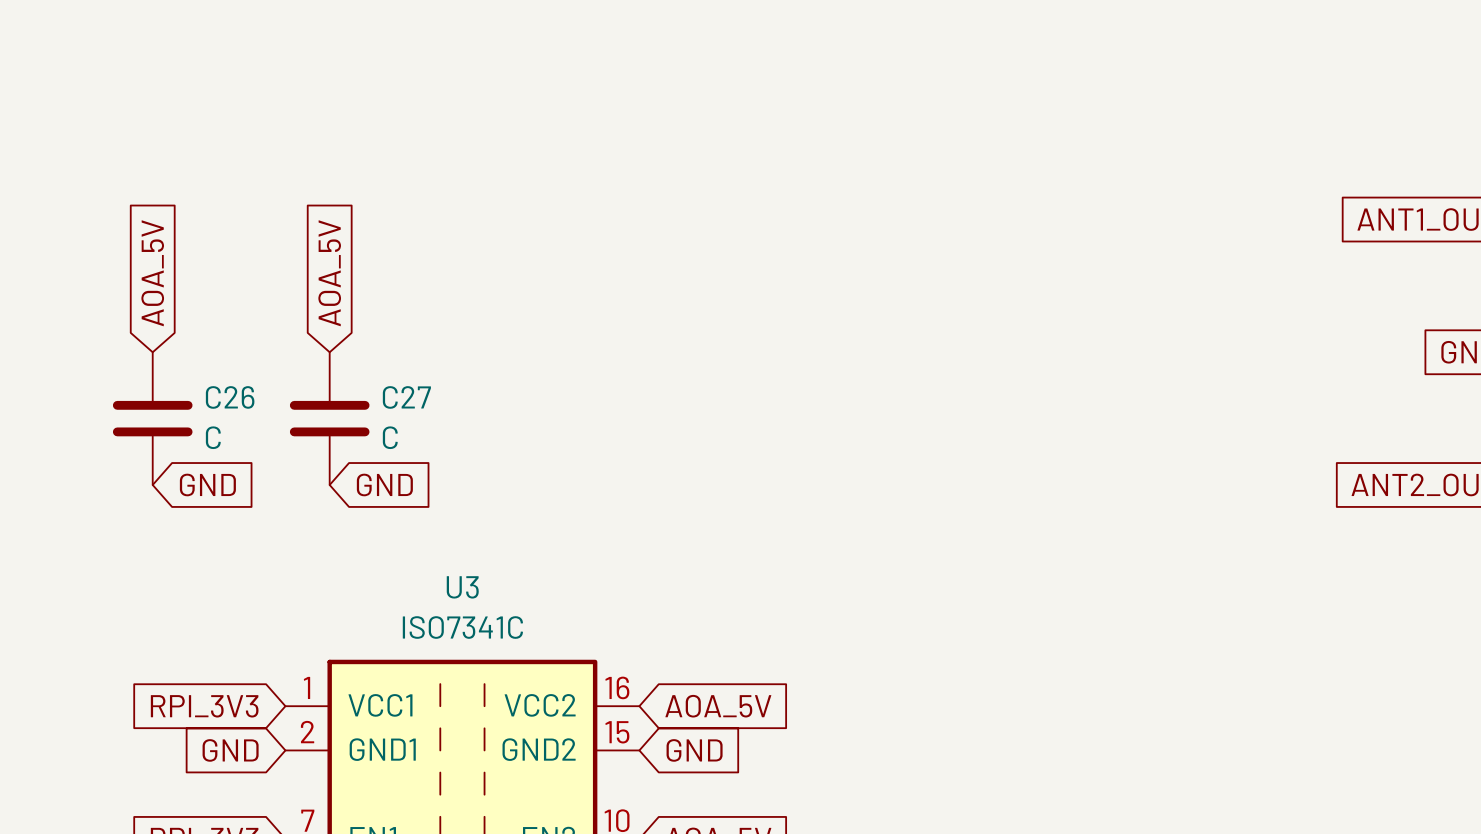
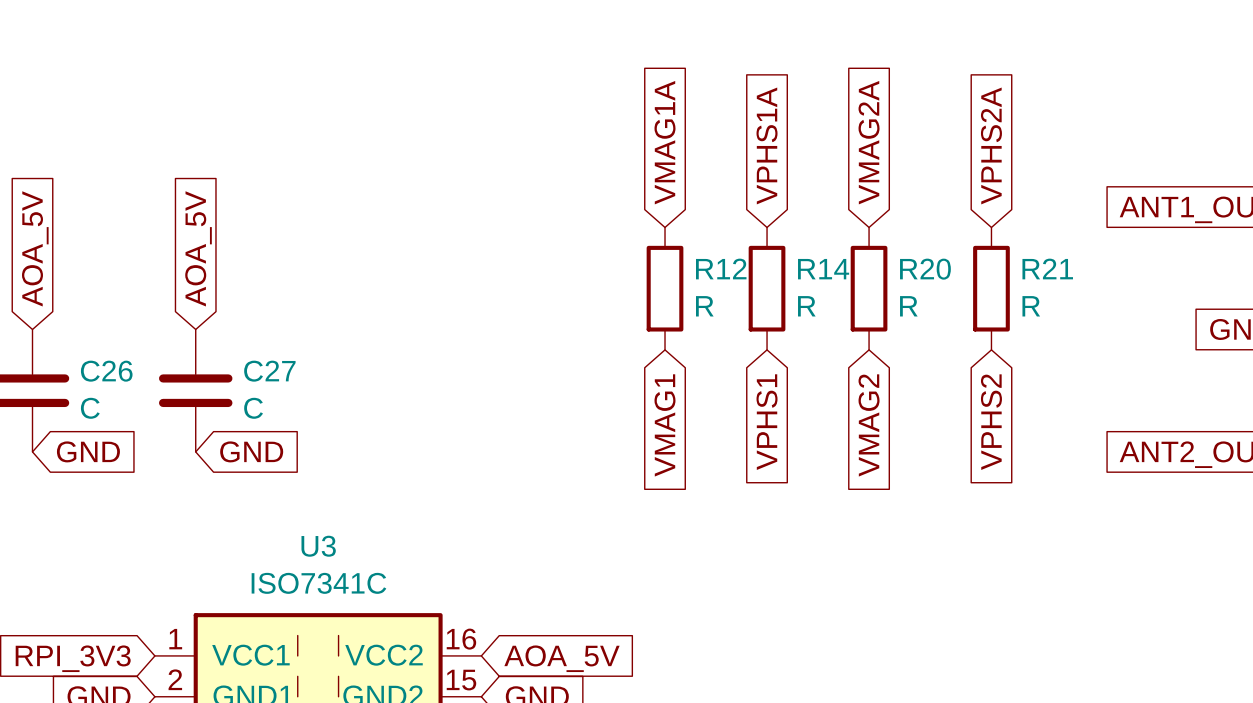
global label: none -> VMAG2A (869, 142)
global label: none -> VPHS2A (991, 145)
global label: none -> VMAG1A (665, 142)
global label: none -> VPHS1A (767, 145)
R12: none -> R (665, 288)
R14: none -> R (767, 288)
R20: none -> R (869, 288)
R21: none -> R (991, 288)
global label: none -> VPHS1 (767, 422)
global label: none -> VMAG1 (665, 425)
global label: none -> VPHS2 (991, 422)
global label: none -> VMAG2 (869, 425)

